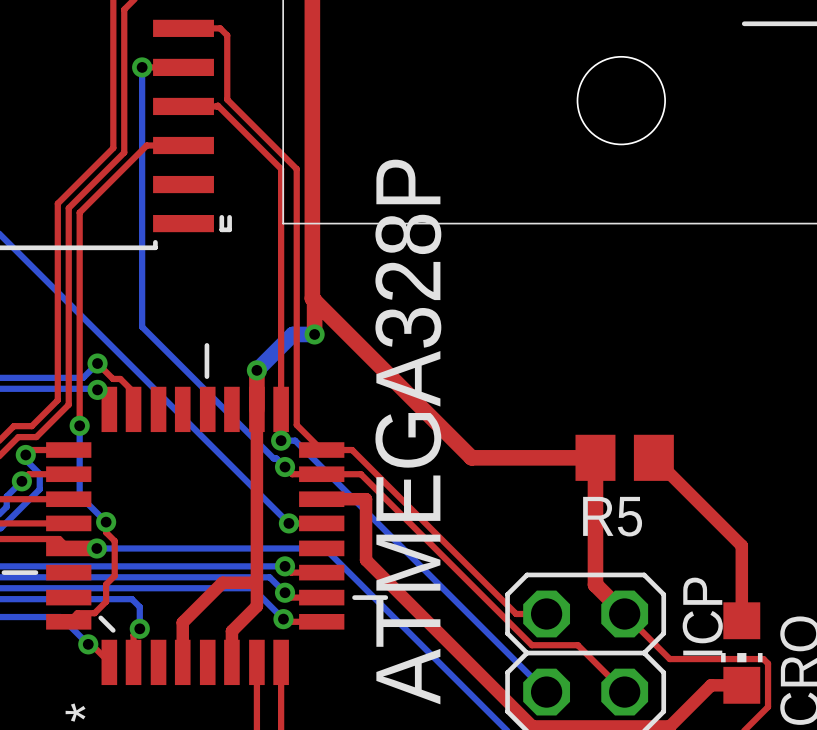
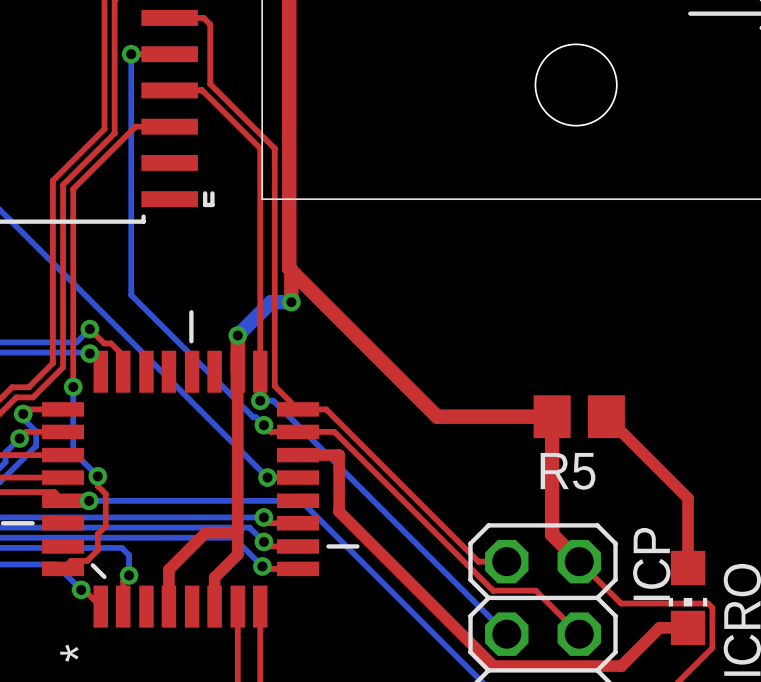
ATMEGA328P name: ATMEGA328P (408, 432) -> none

